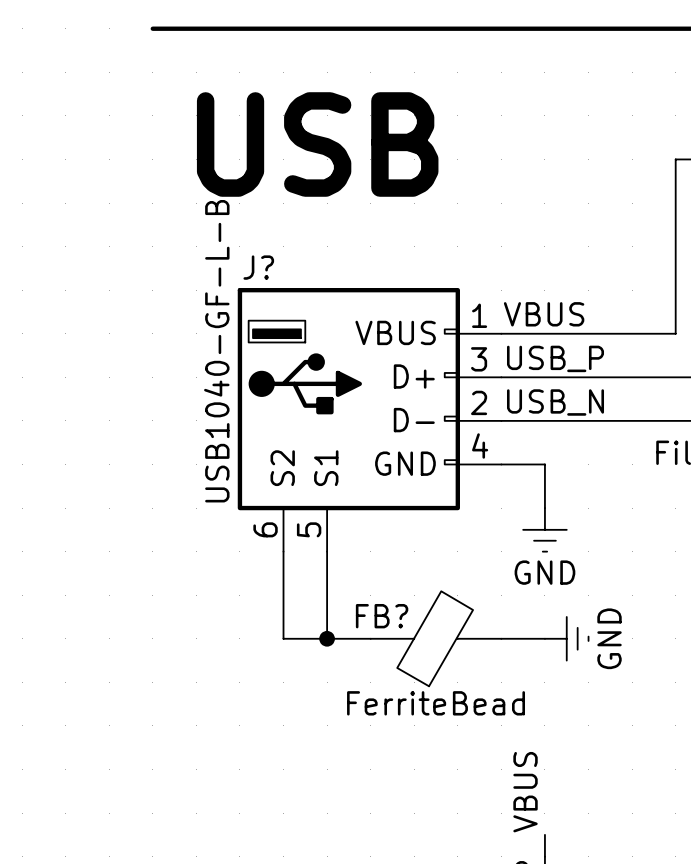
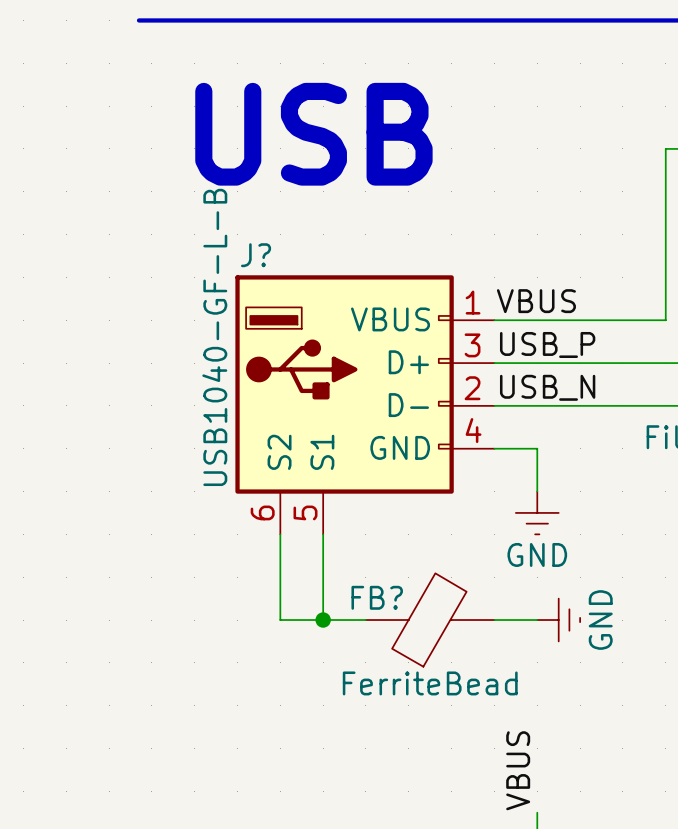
line: none -> (139, 20) (151, 20)

